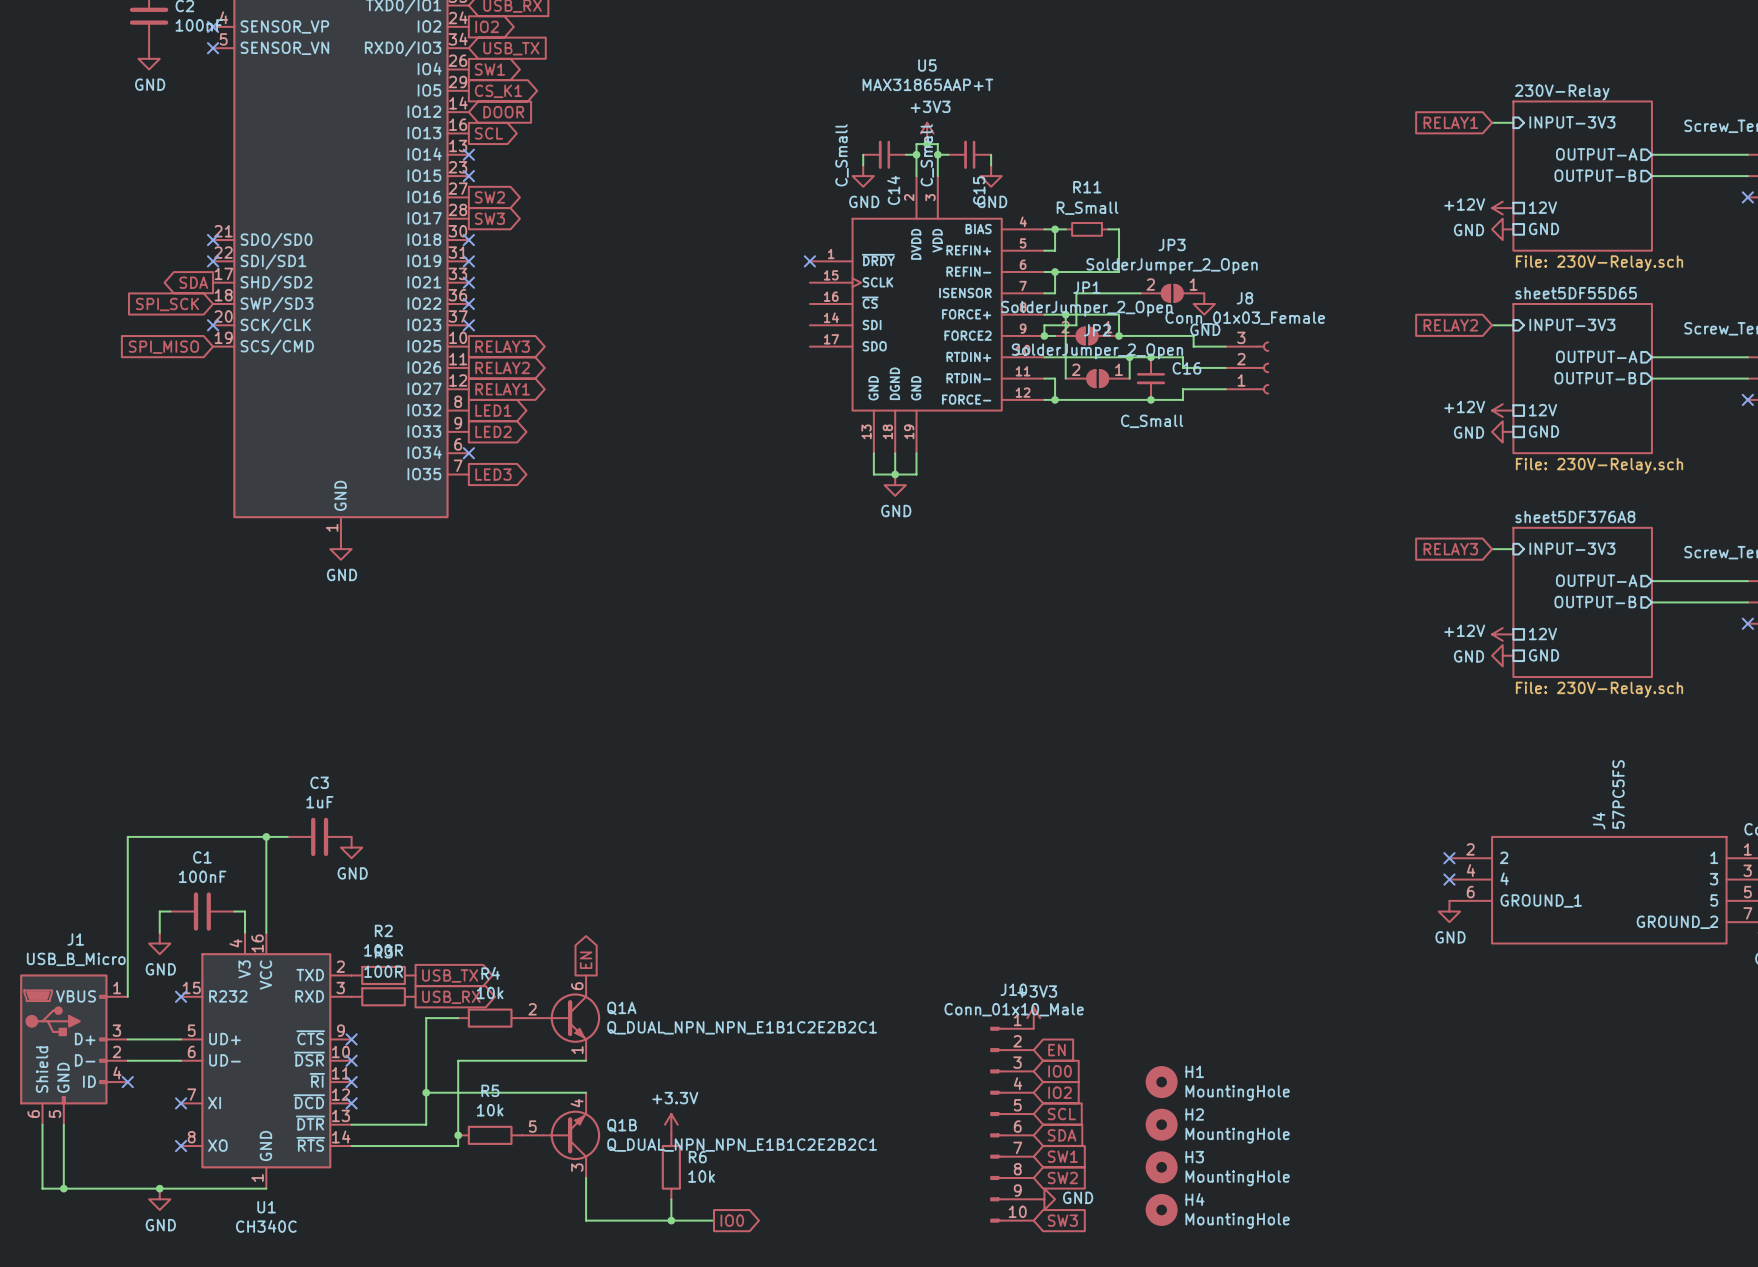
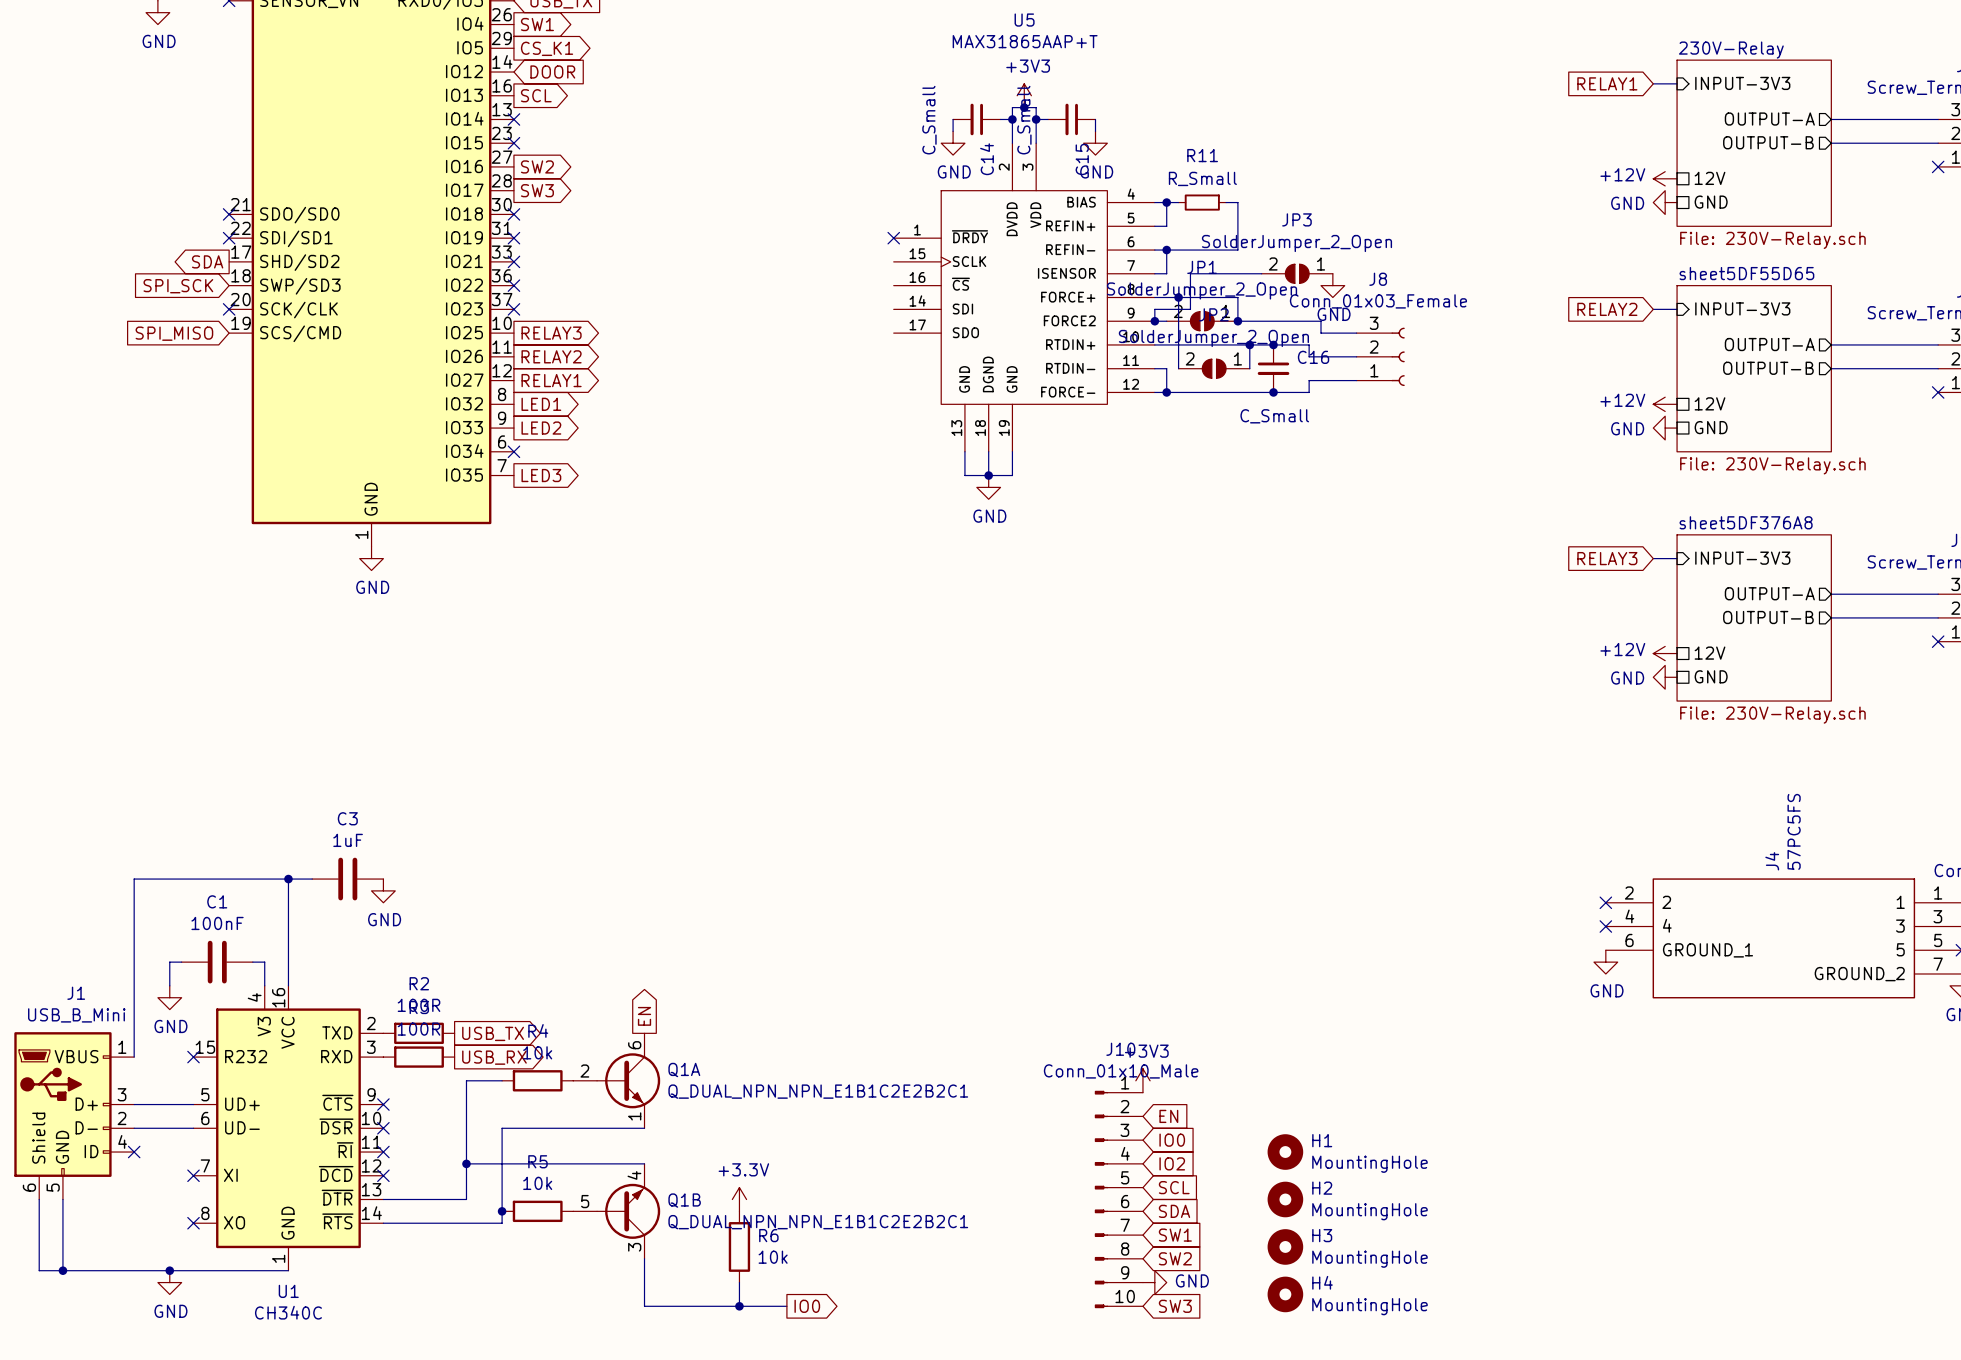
J1 value: USB_B_Micro (76, 959) -> USB_B_Mini (76, 1015)

